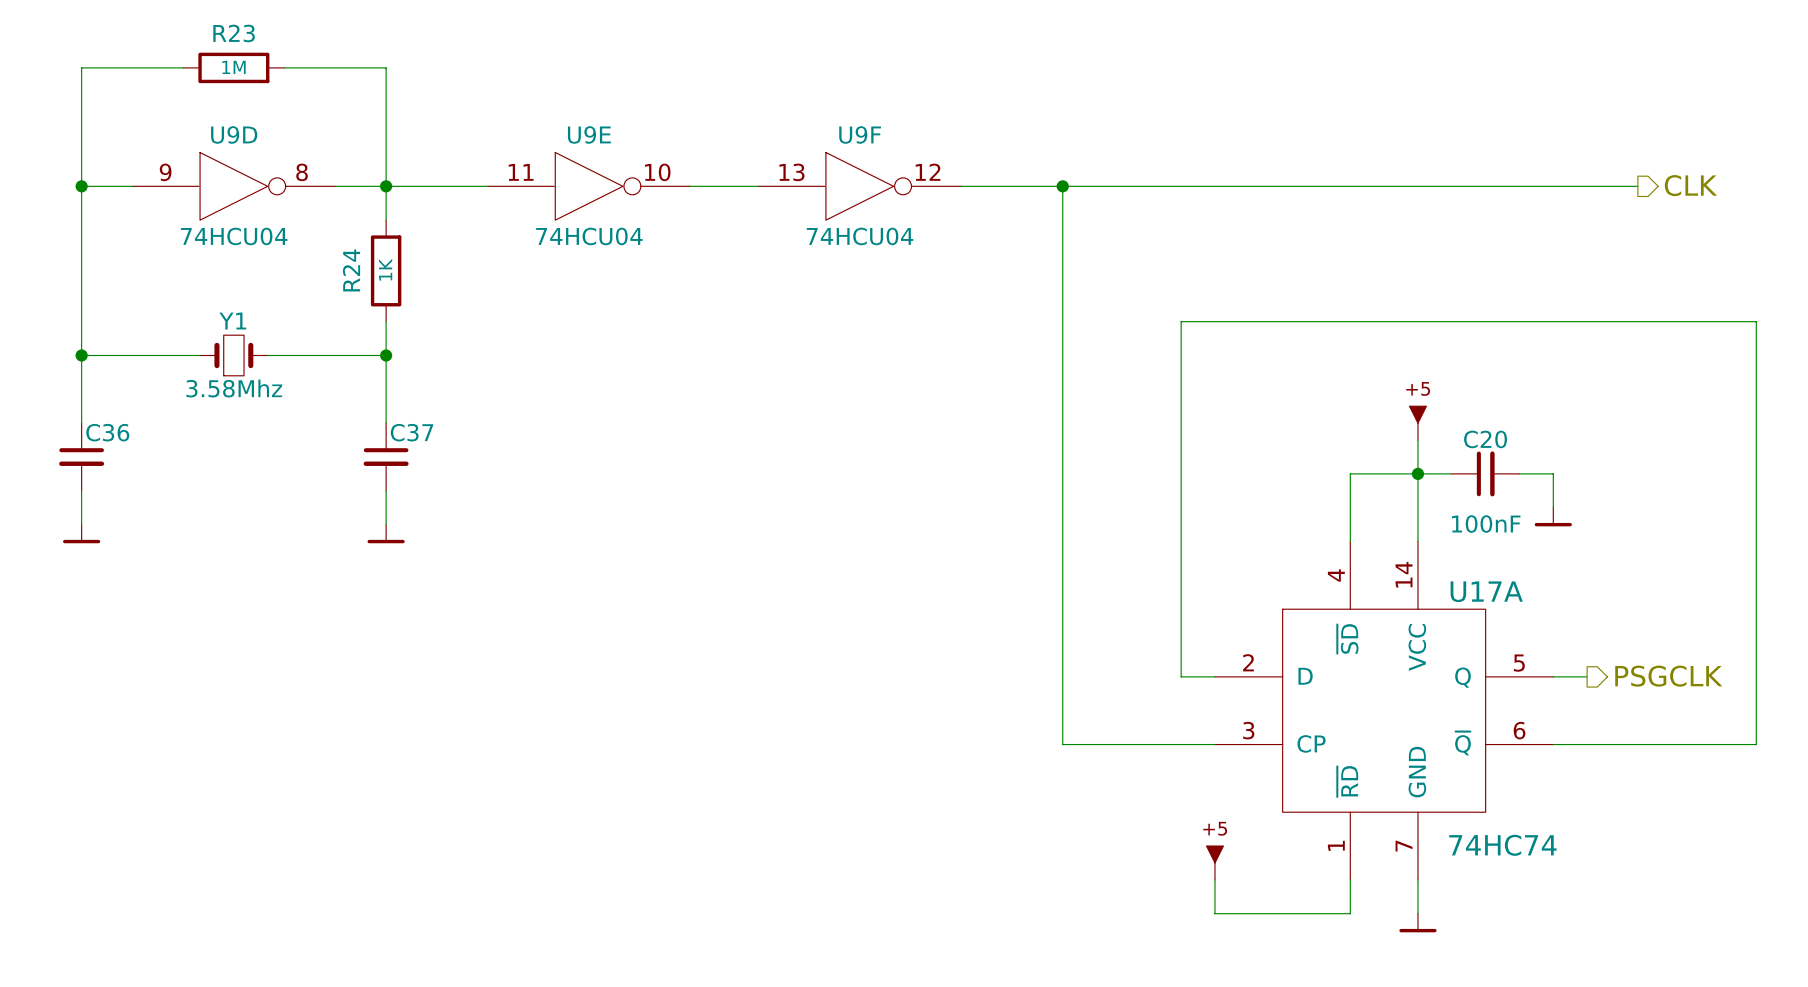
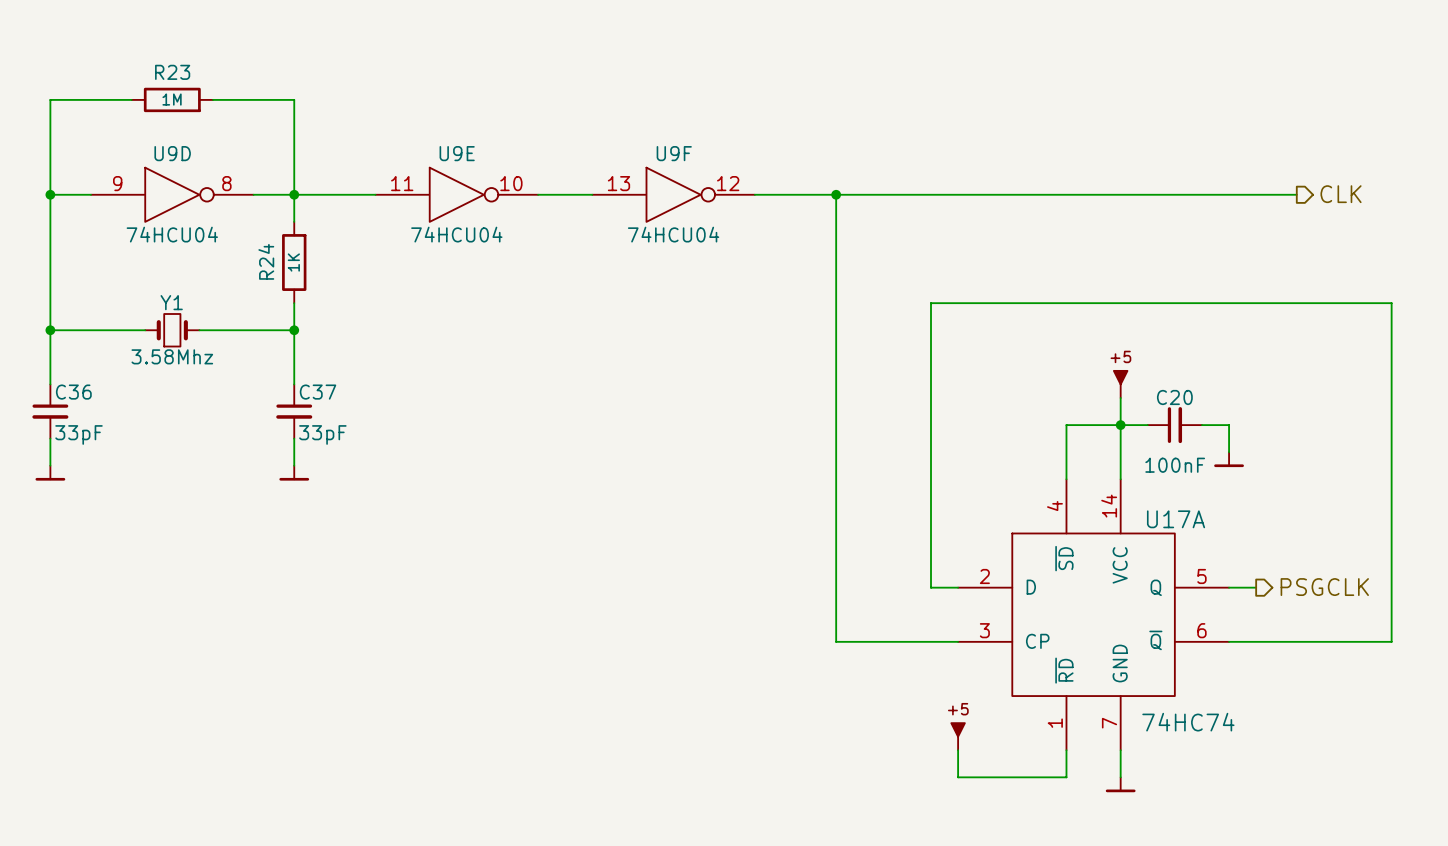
C36 value: none -> 33pF (79, 434)
C37 value: none -> 33pF (322, 434)

